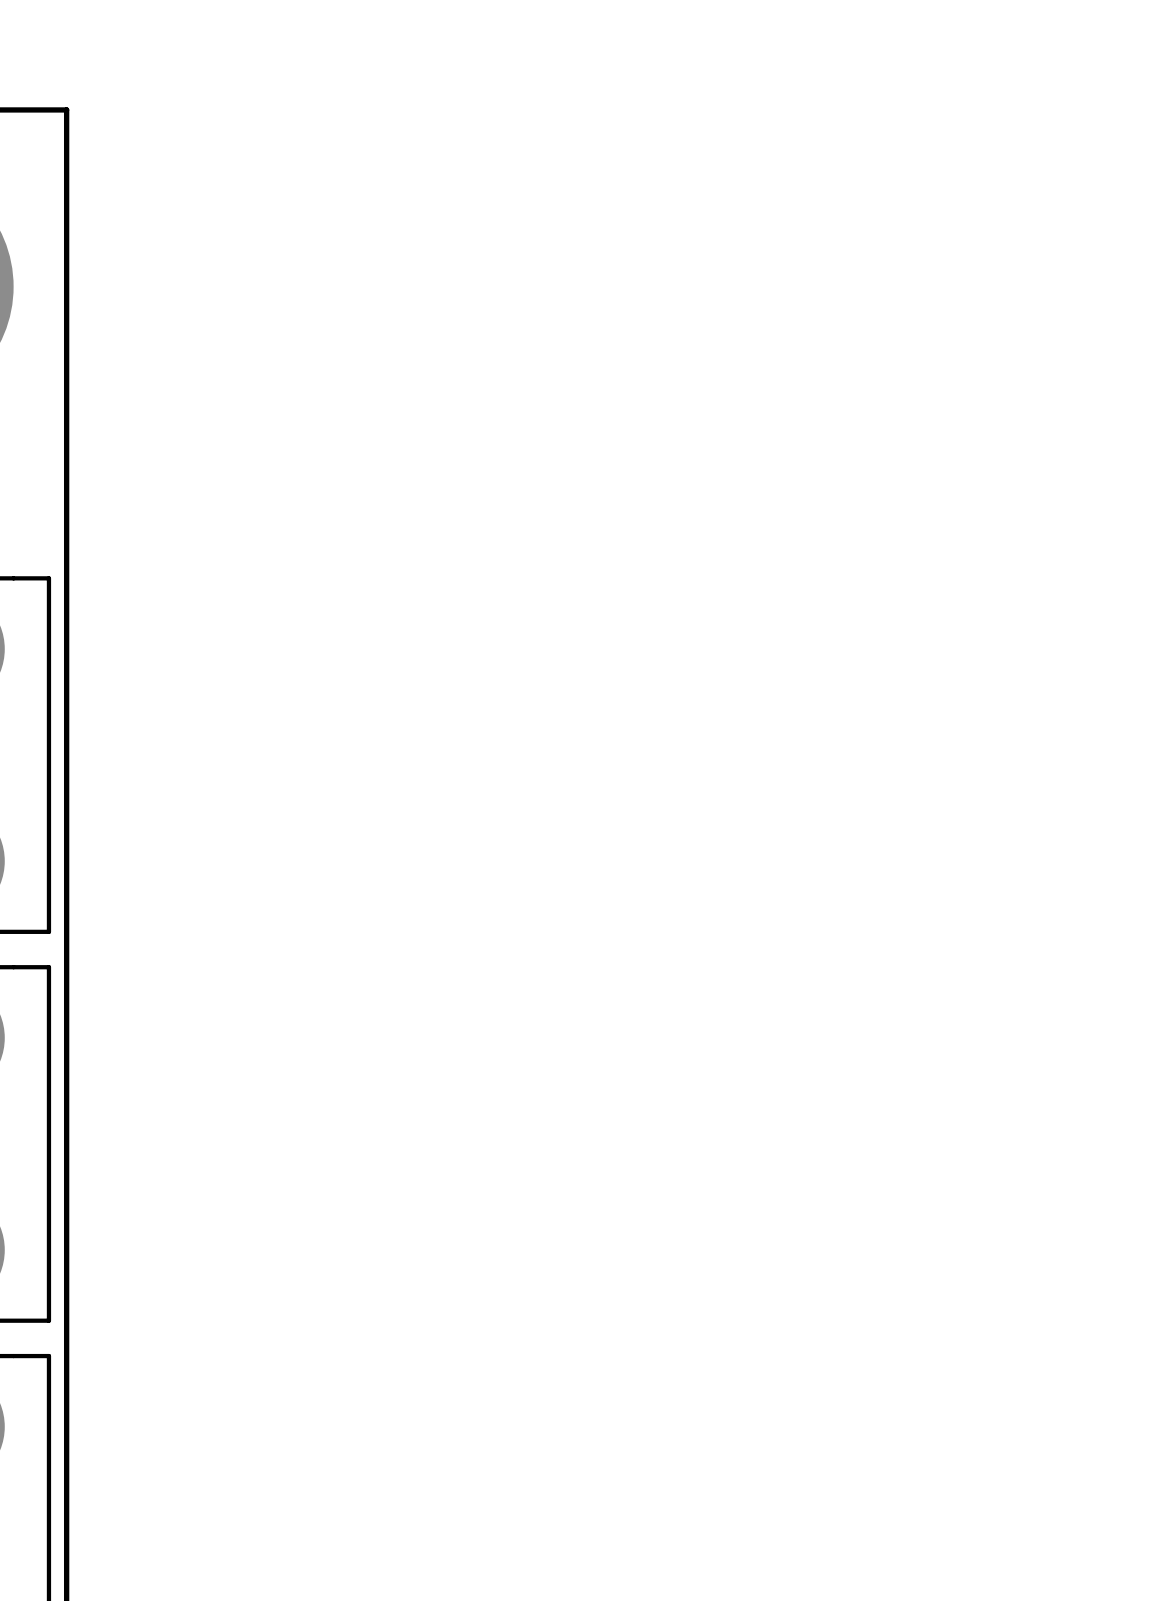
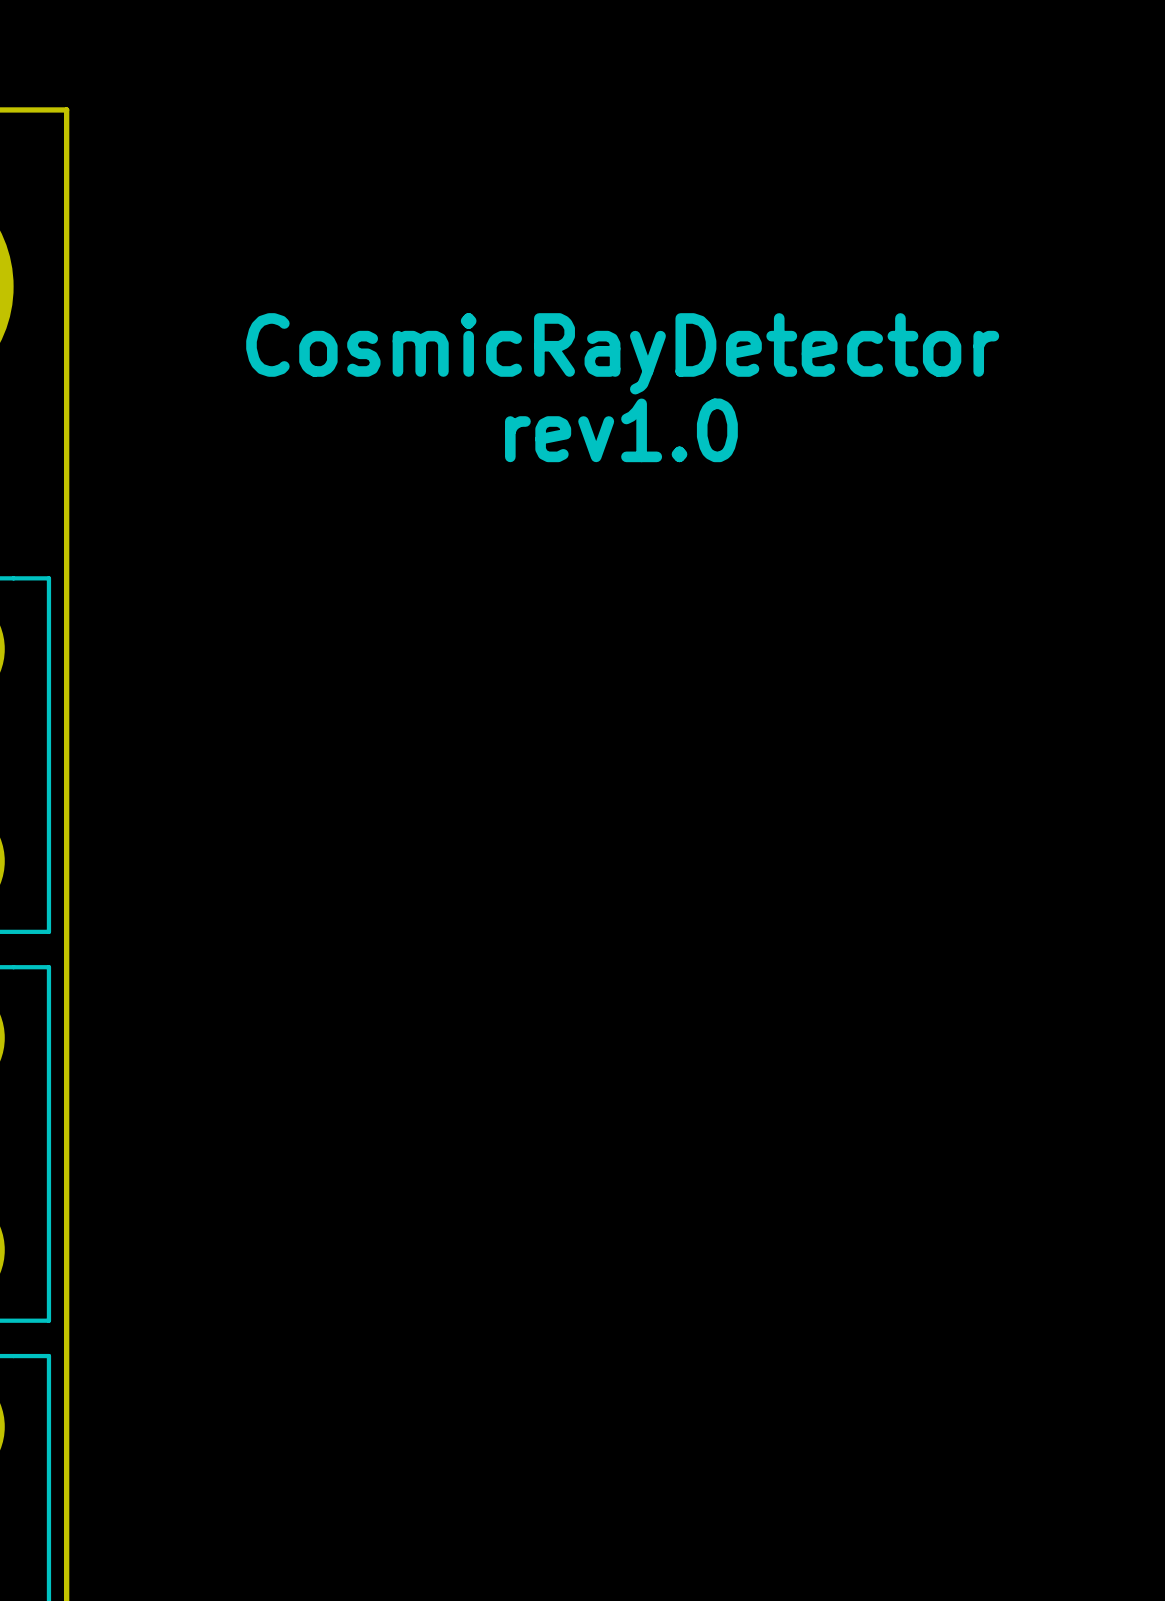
text: none -> CosmicRayDetector (622, 353)
text: none -> rev1.0 (621, 430)

